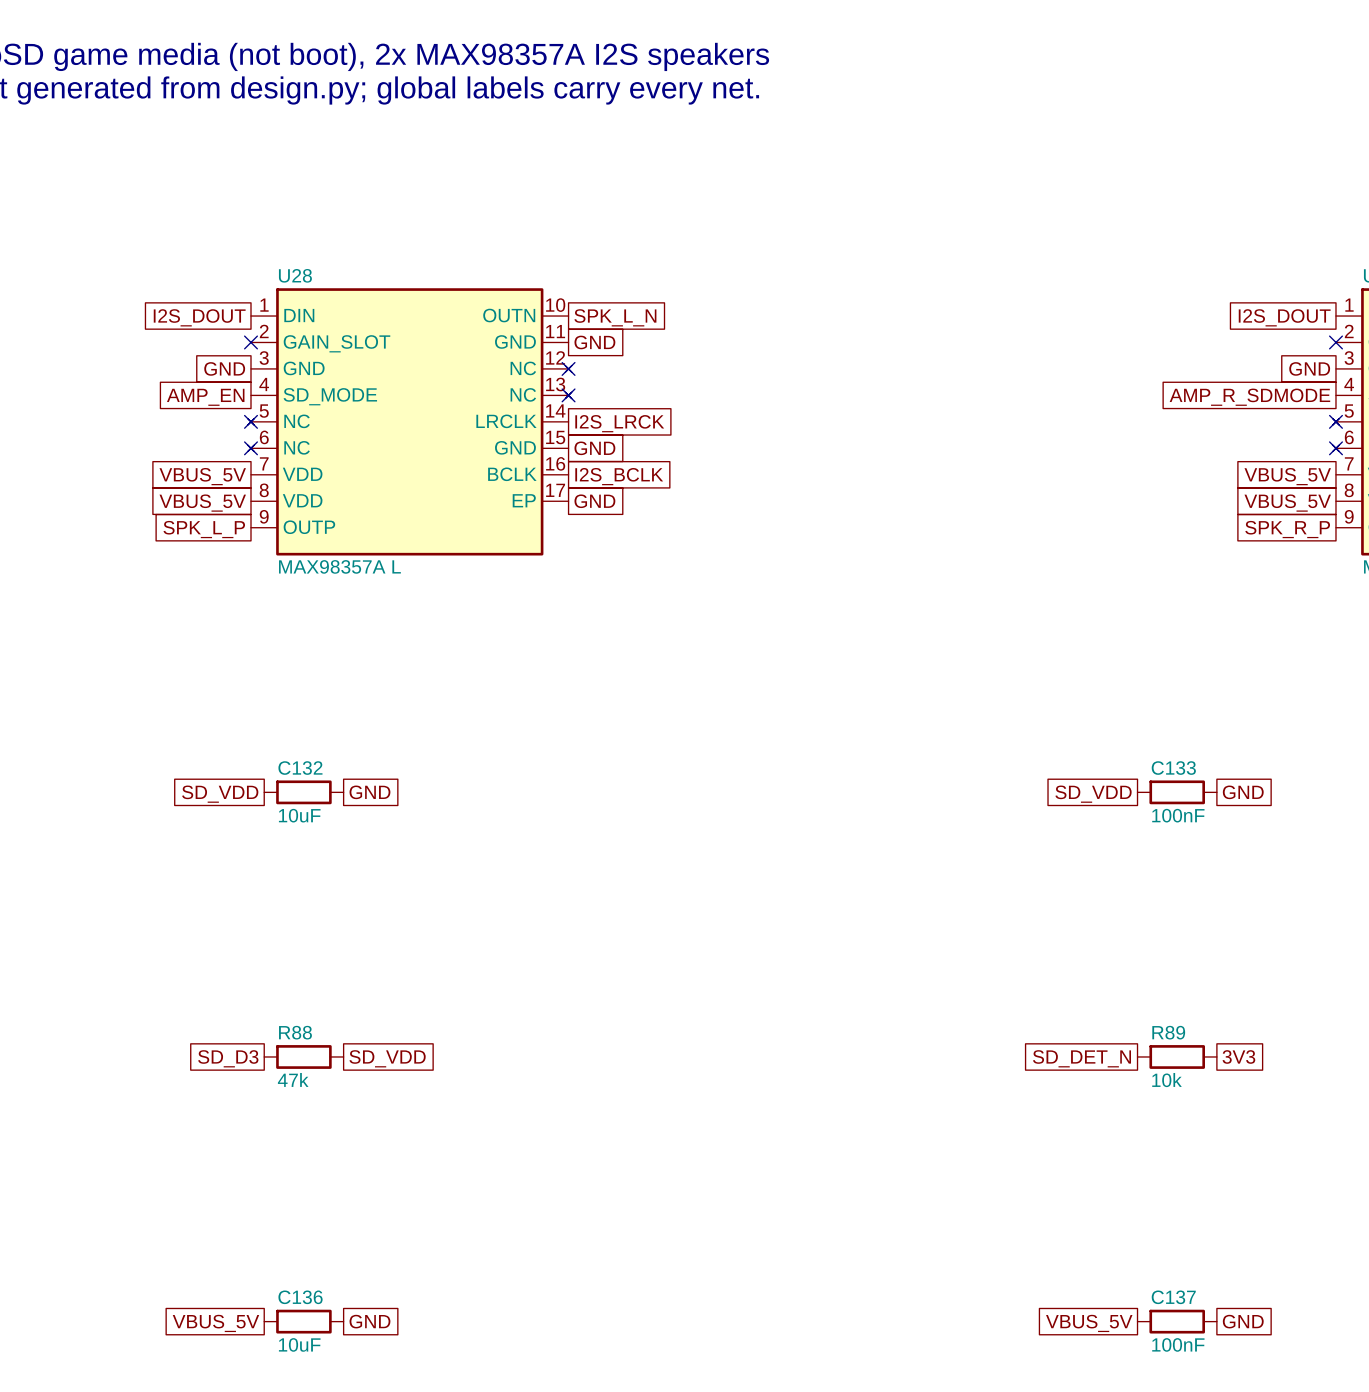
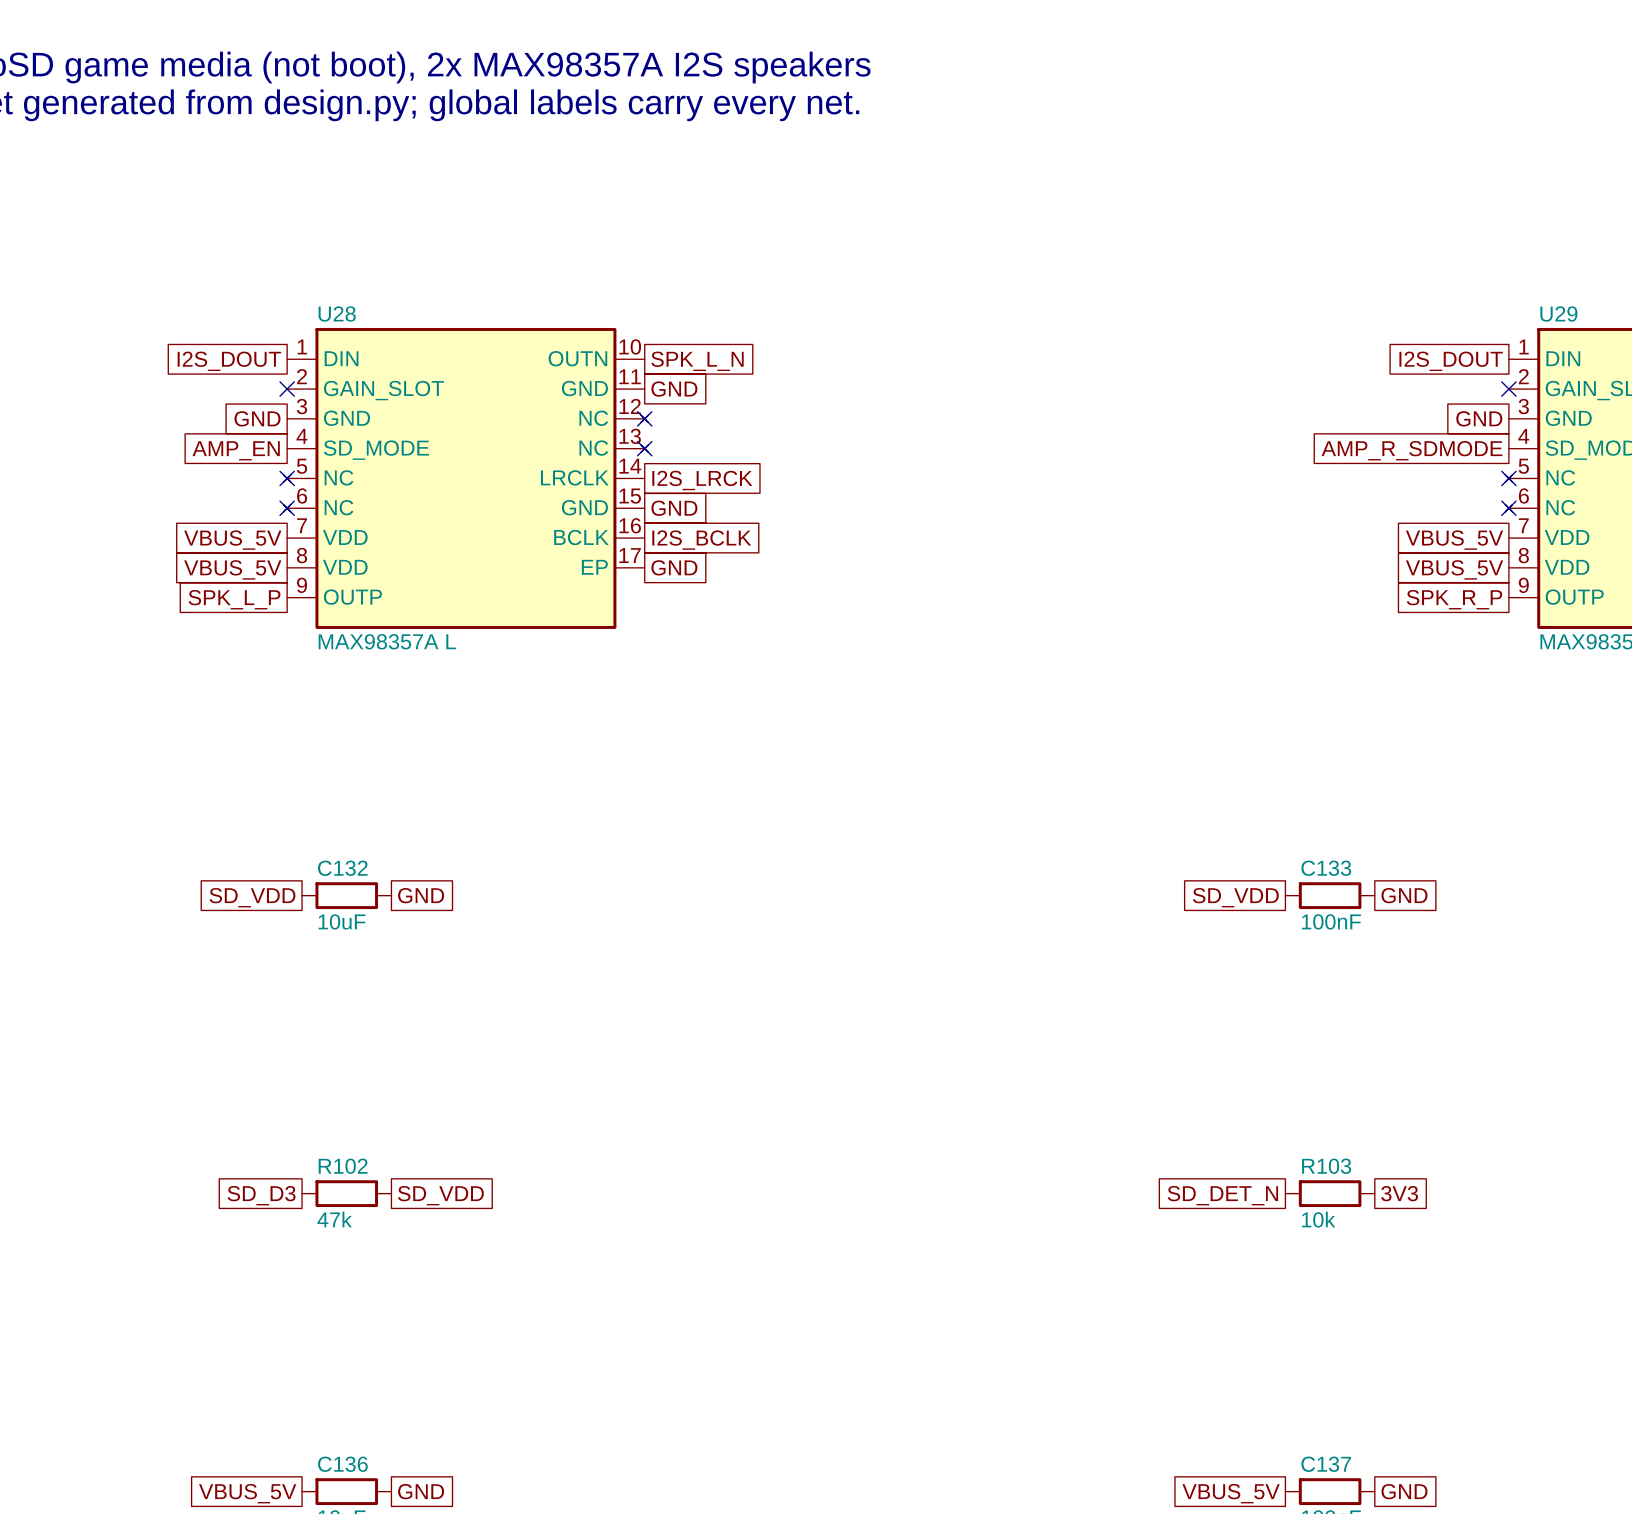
R88 name: R88 (295, 1032) -> R102 (343, 1166)
R89 name: R89 (1168, 1032) -> R103 (1326, 1166)

